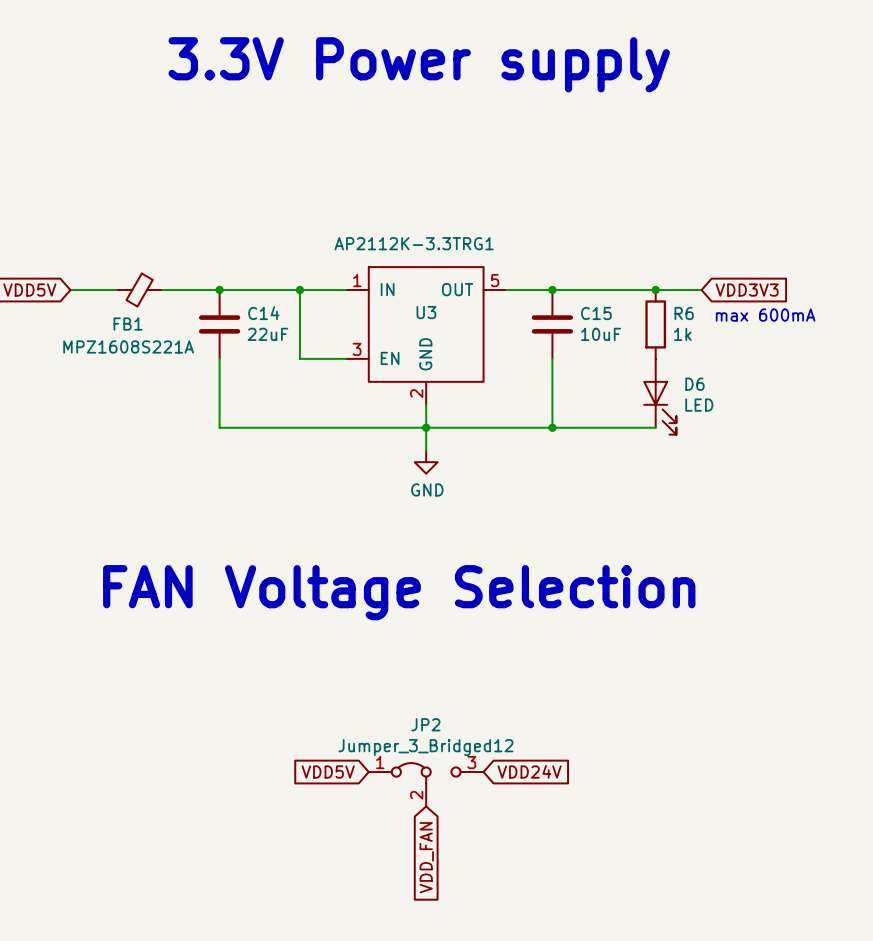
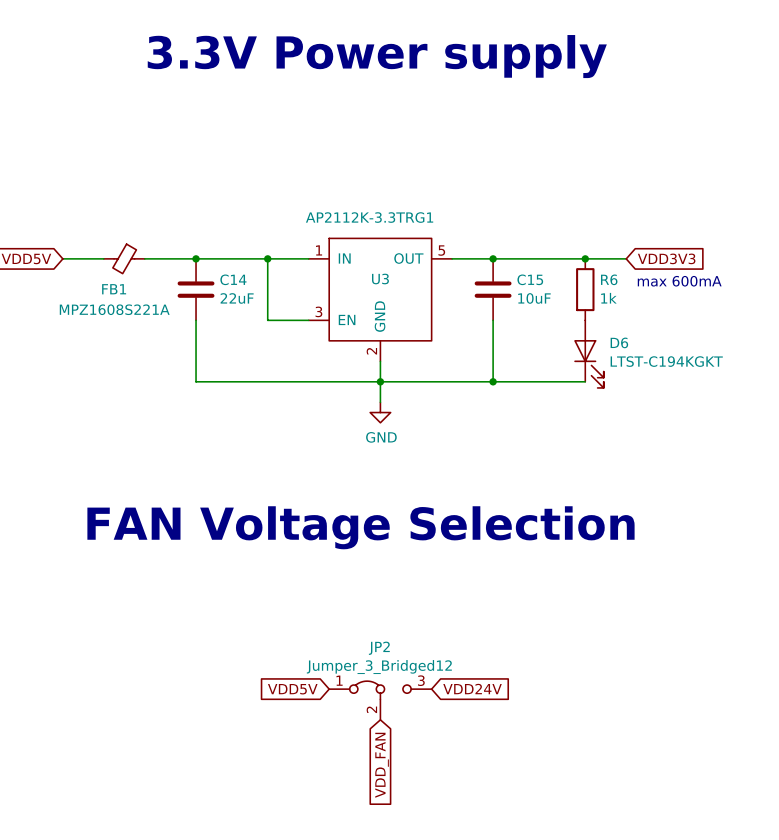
D6 value: LED (699, 405) -> LTST-C194KGKT (666, 361)

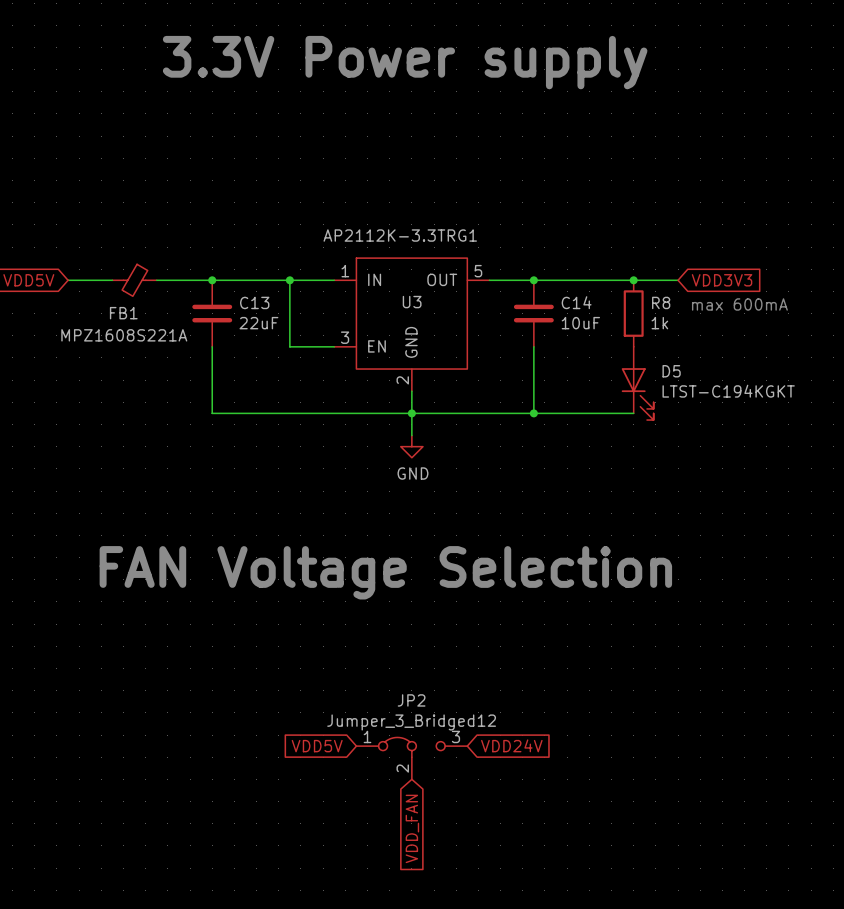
C14 name: C14 (233, 279) -> C13 (254, 302)
C15 name: C15 (530, 279) -> C14 (576, 302)
R6 name: R6 (609, 279) -> R8 (661, 302)
D6 name: D6 (619, 342) -> D5 (671, 371)

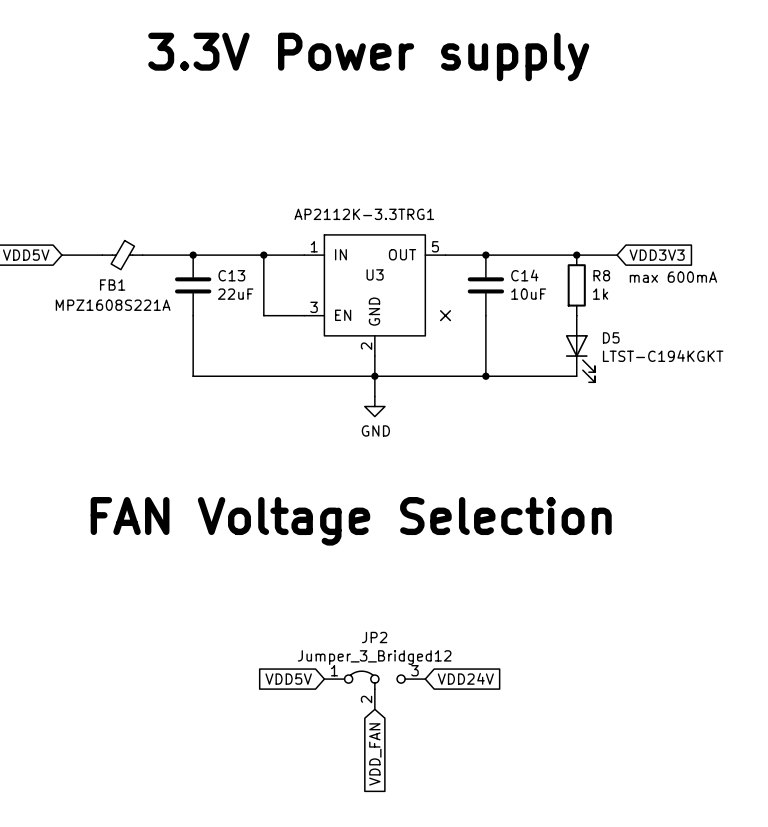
no-connect mark: none -> (445, 315)

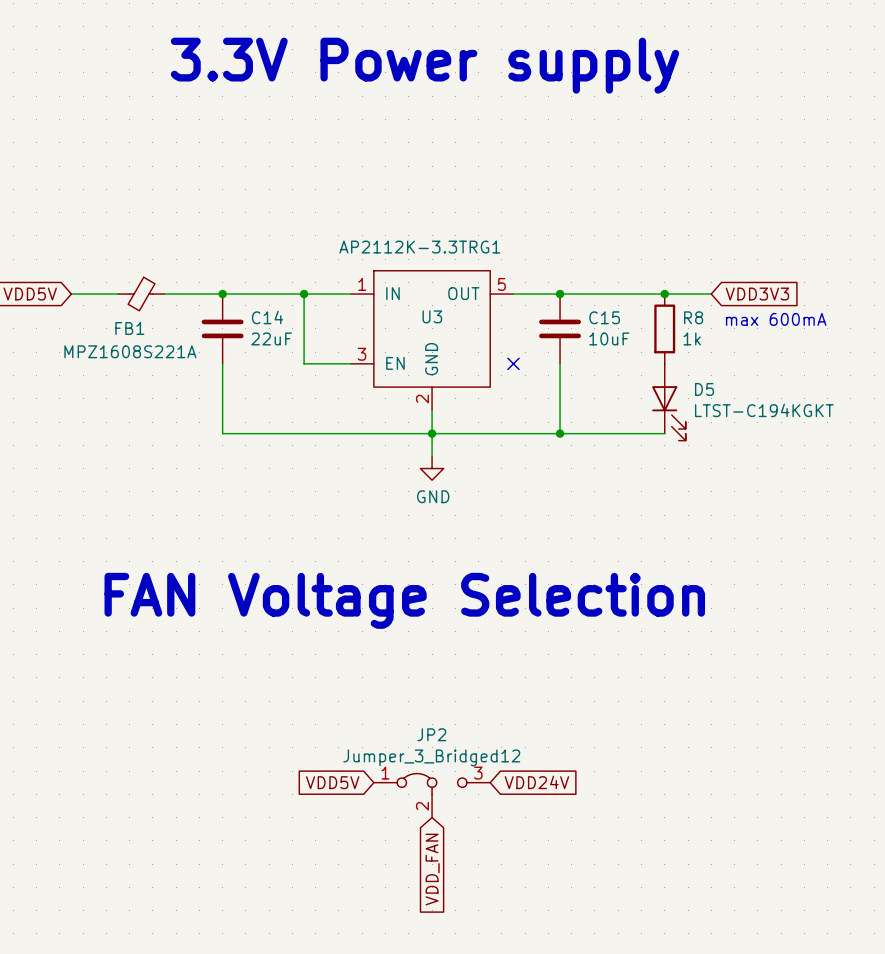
C13 name: C13 (231, 275) -> C14 (267, 317)
C14 name: C14 (524, 275) -> C15 (604, 317)

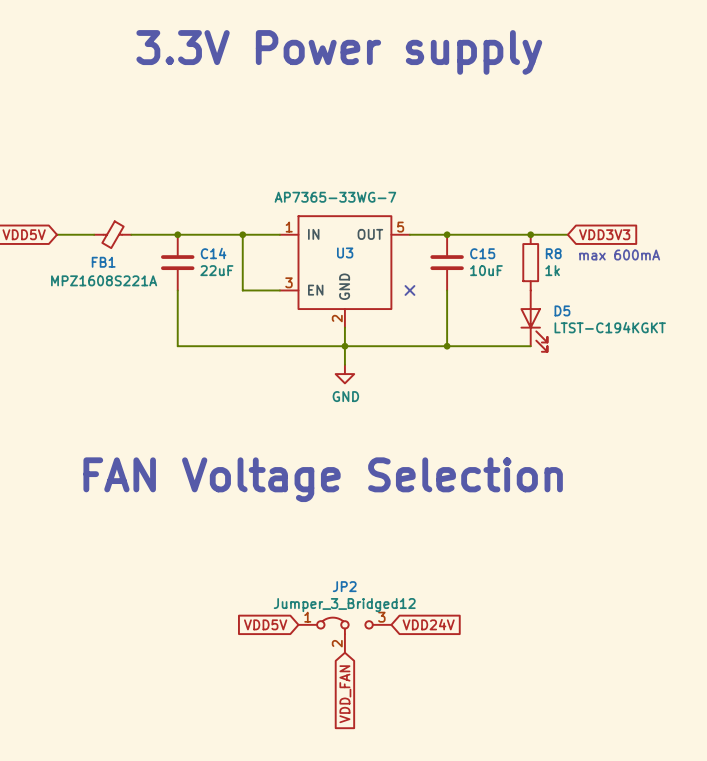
U3 value: AP2112K-3.3TRG1 (419, 247) -> AP7365-33WG-7 (335, 197)

